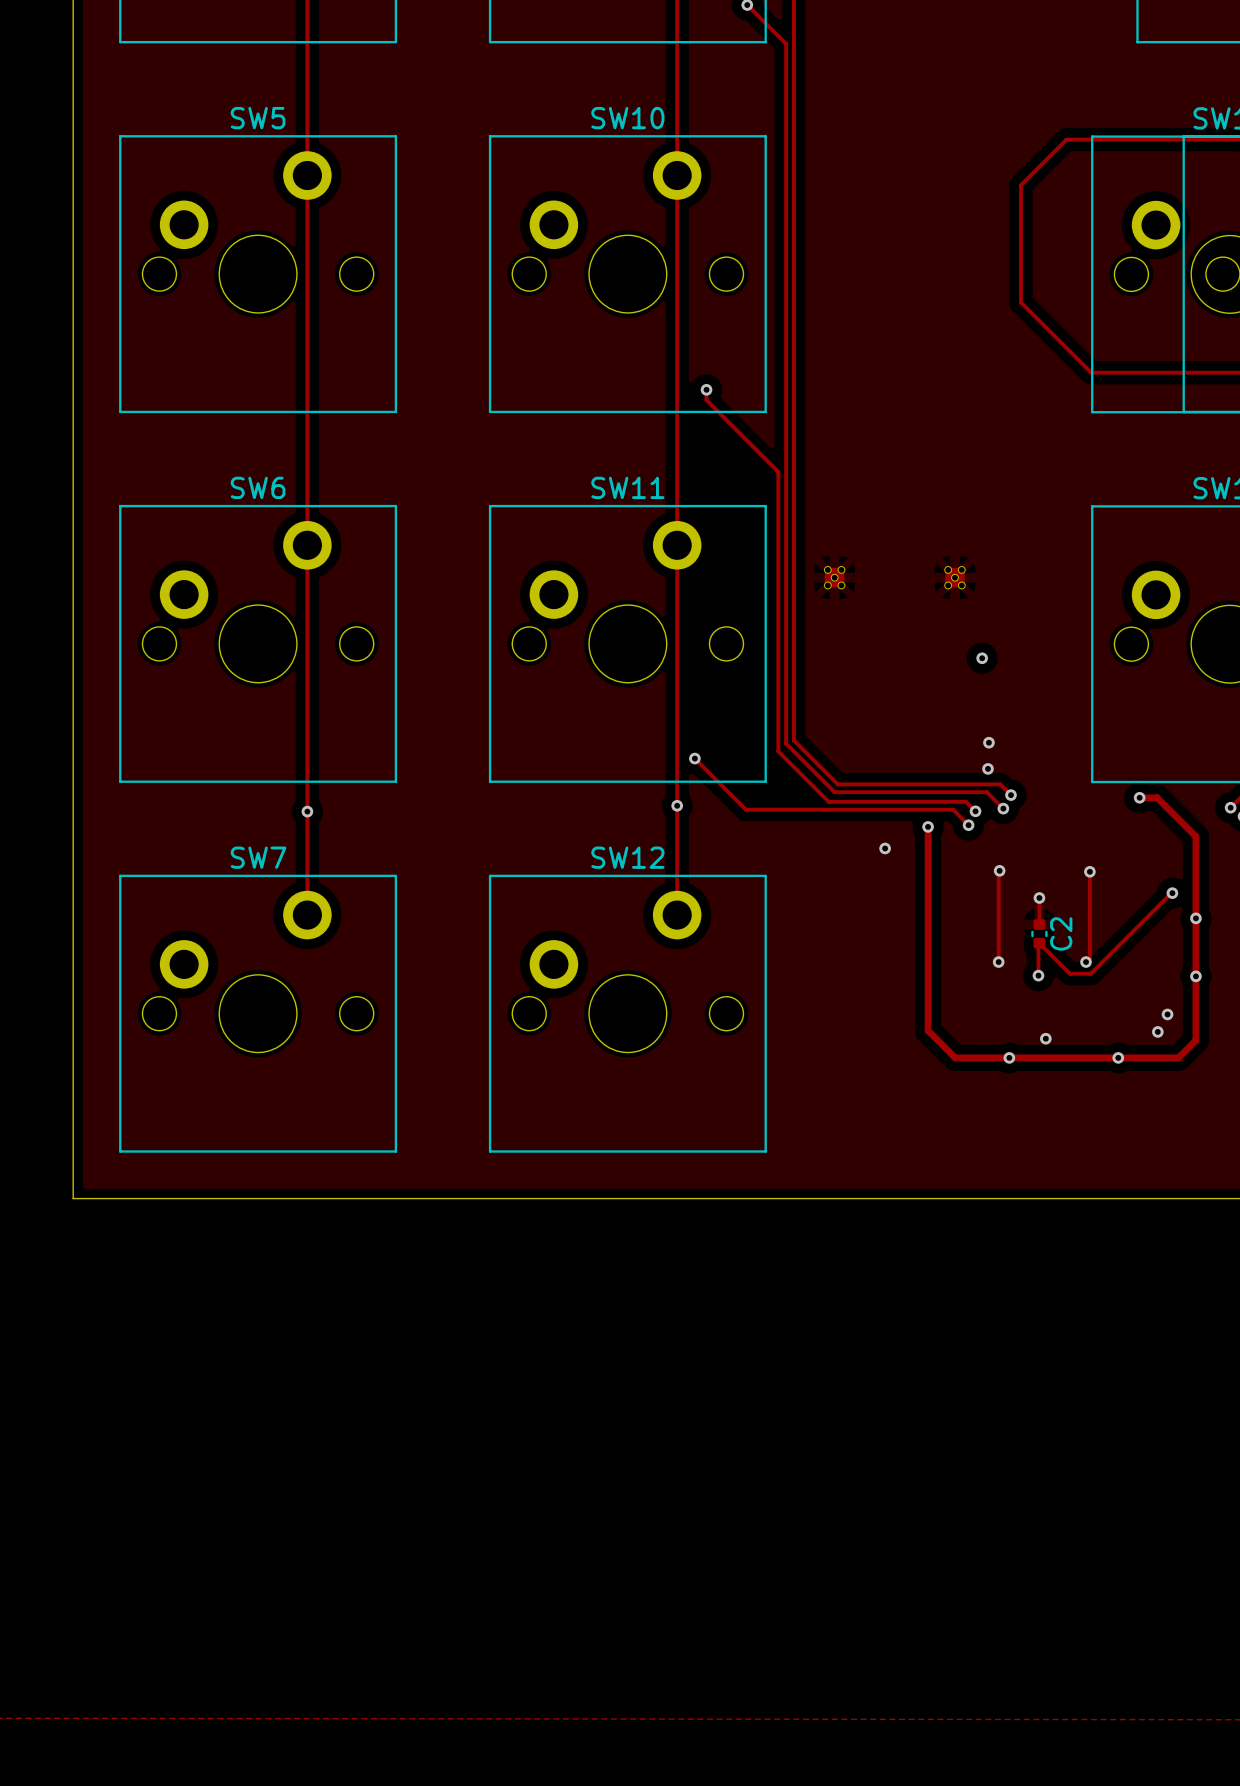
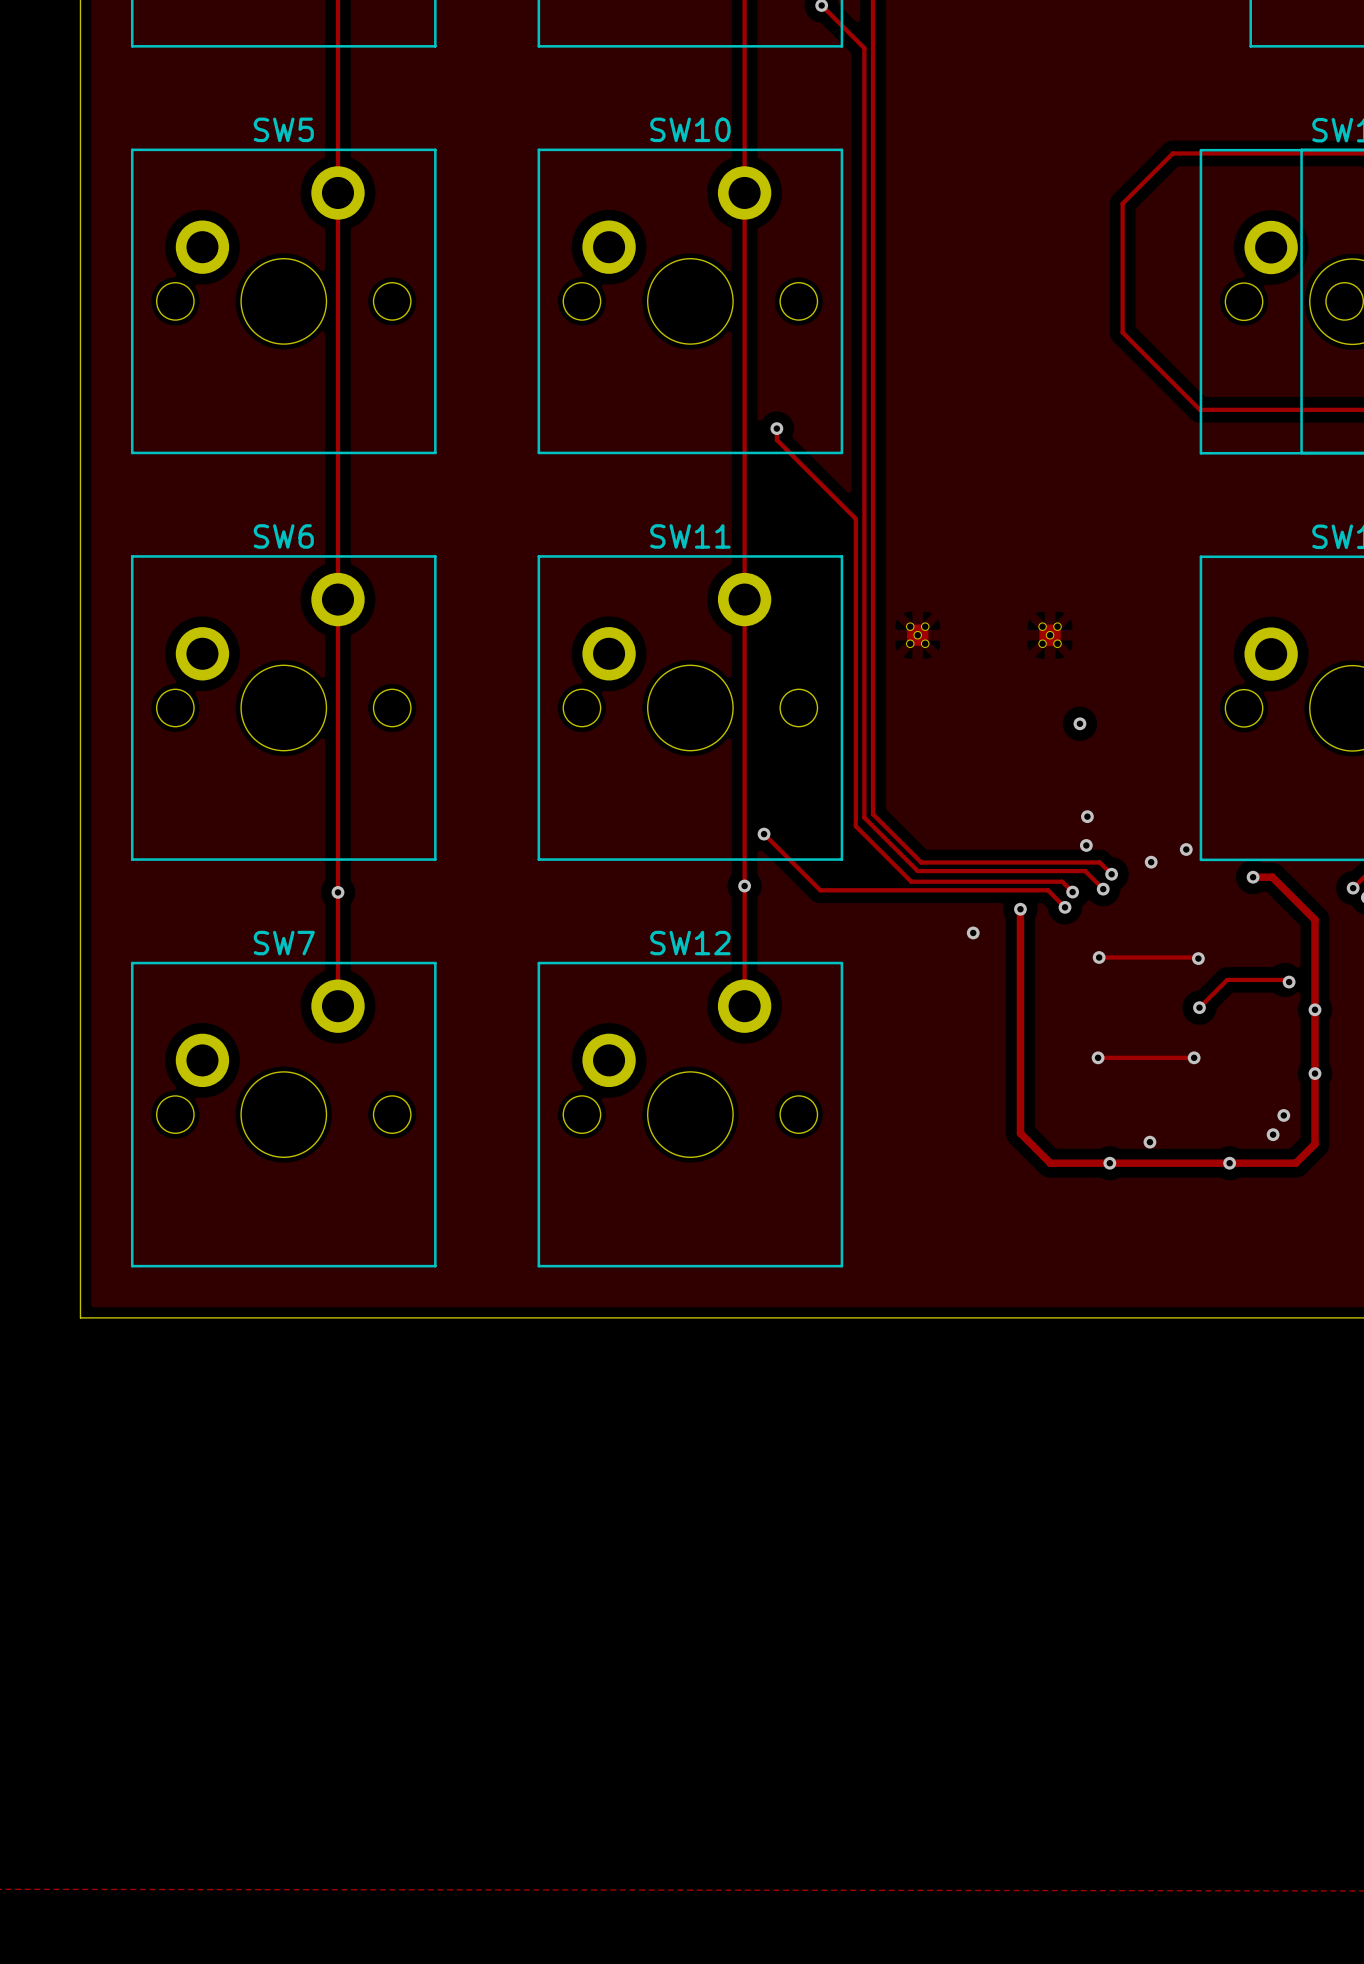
via: none -> (1186, 849)
via: none -> (1151, 862)
track: (999, 870) (998, 962) -> (1194, 1057) (1098, 1057)
track: none -> (1099, 957) (1197, 957)
track: (1089, 871) (1089, 958) (1086, 962) -> none
track: none -> (1284, 979) (1227, 979) (1199, 1007)
track: (1172, 893) (1090, 973) (1069, 973) (1039, 943) (1038, 975) -> none
track: (1039, 897) (1039, 924) -> none
via: (1039, 897) -> none
via: none -> (1199, 1007)
C2: (1039, 933) -> none
via: (1038, 975) -> none

